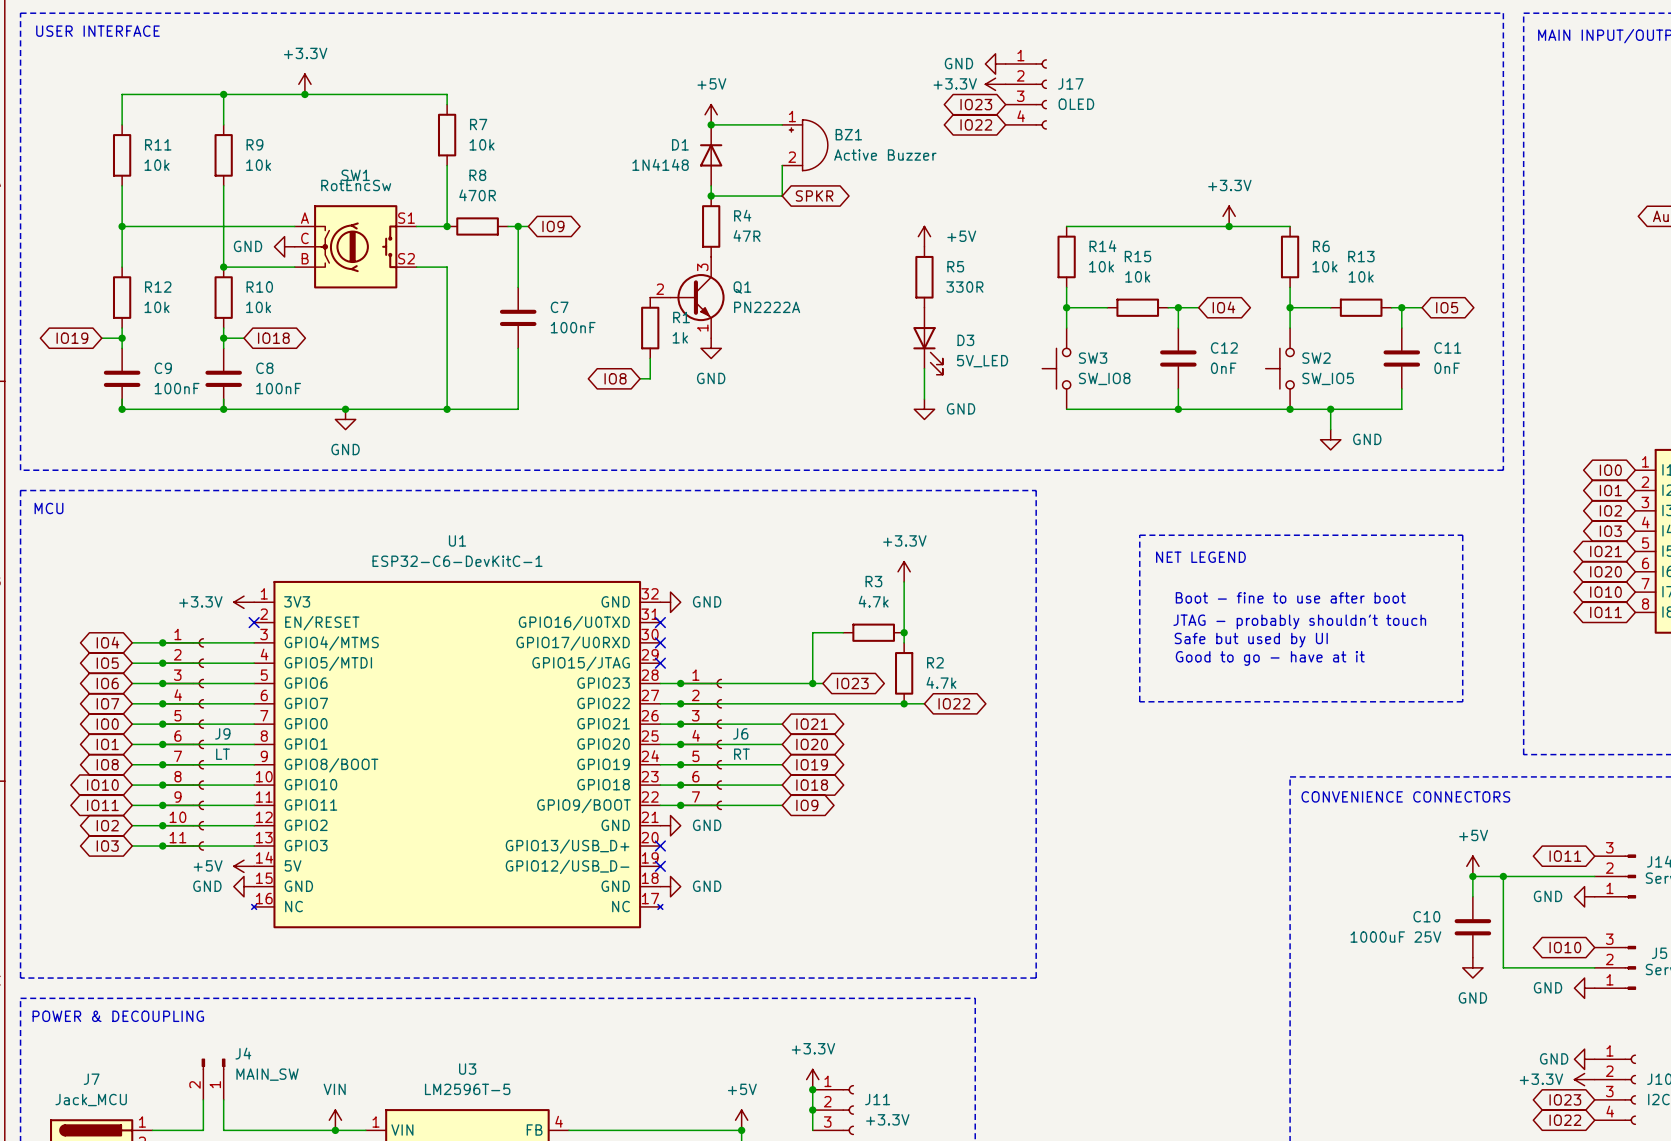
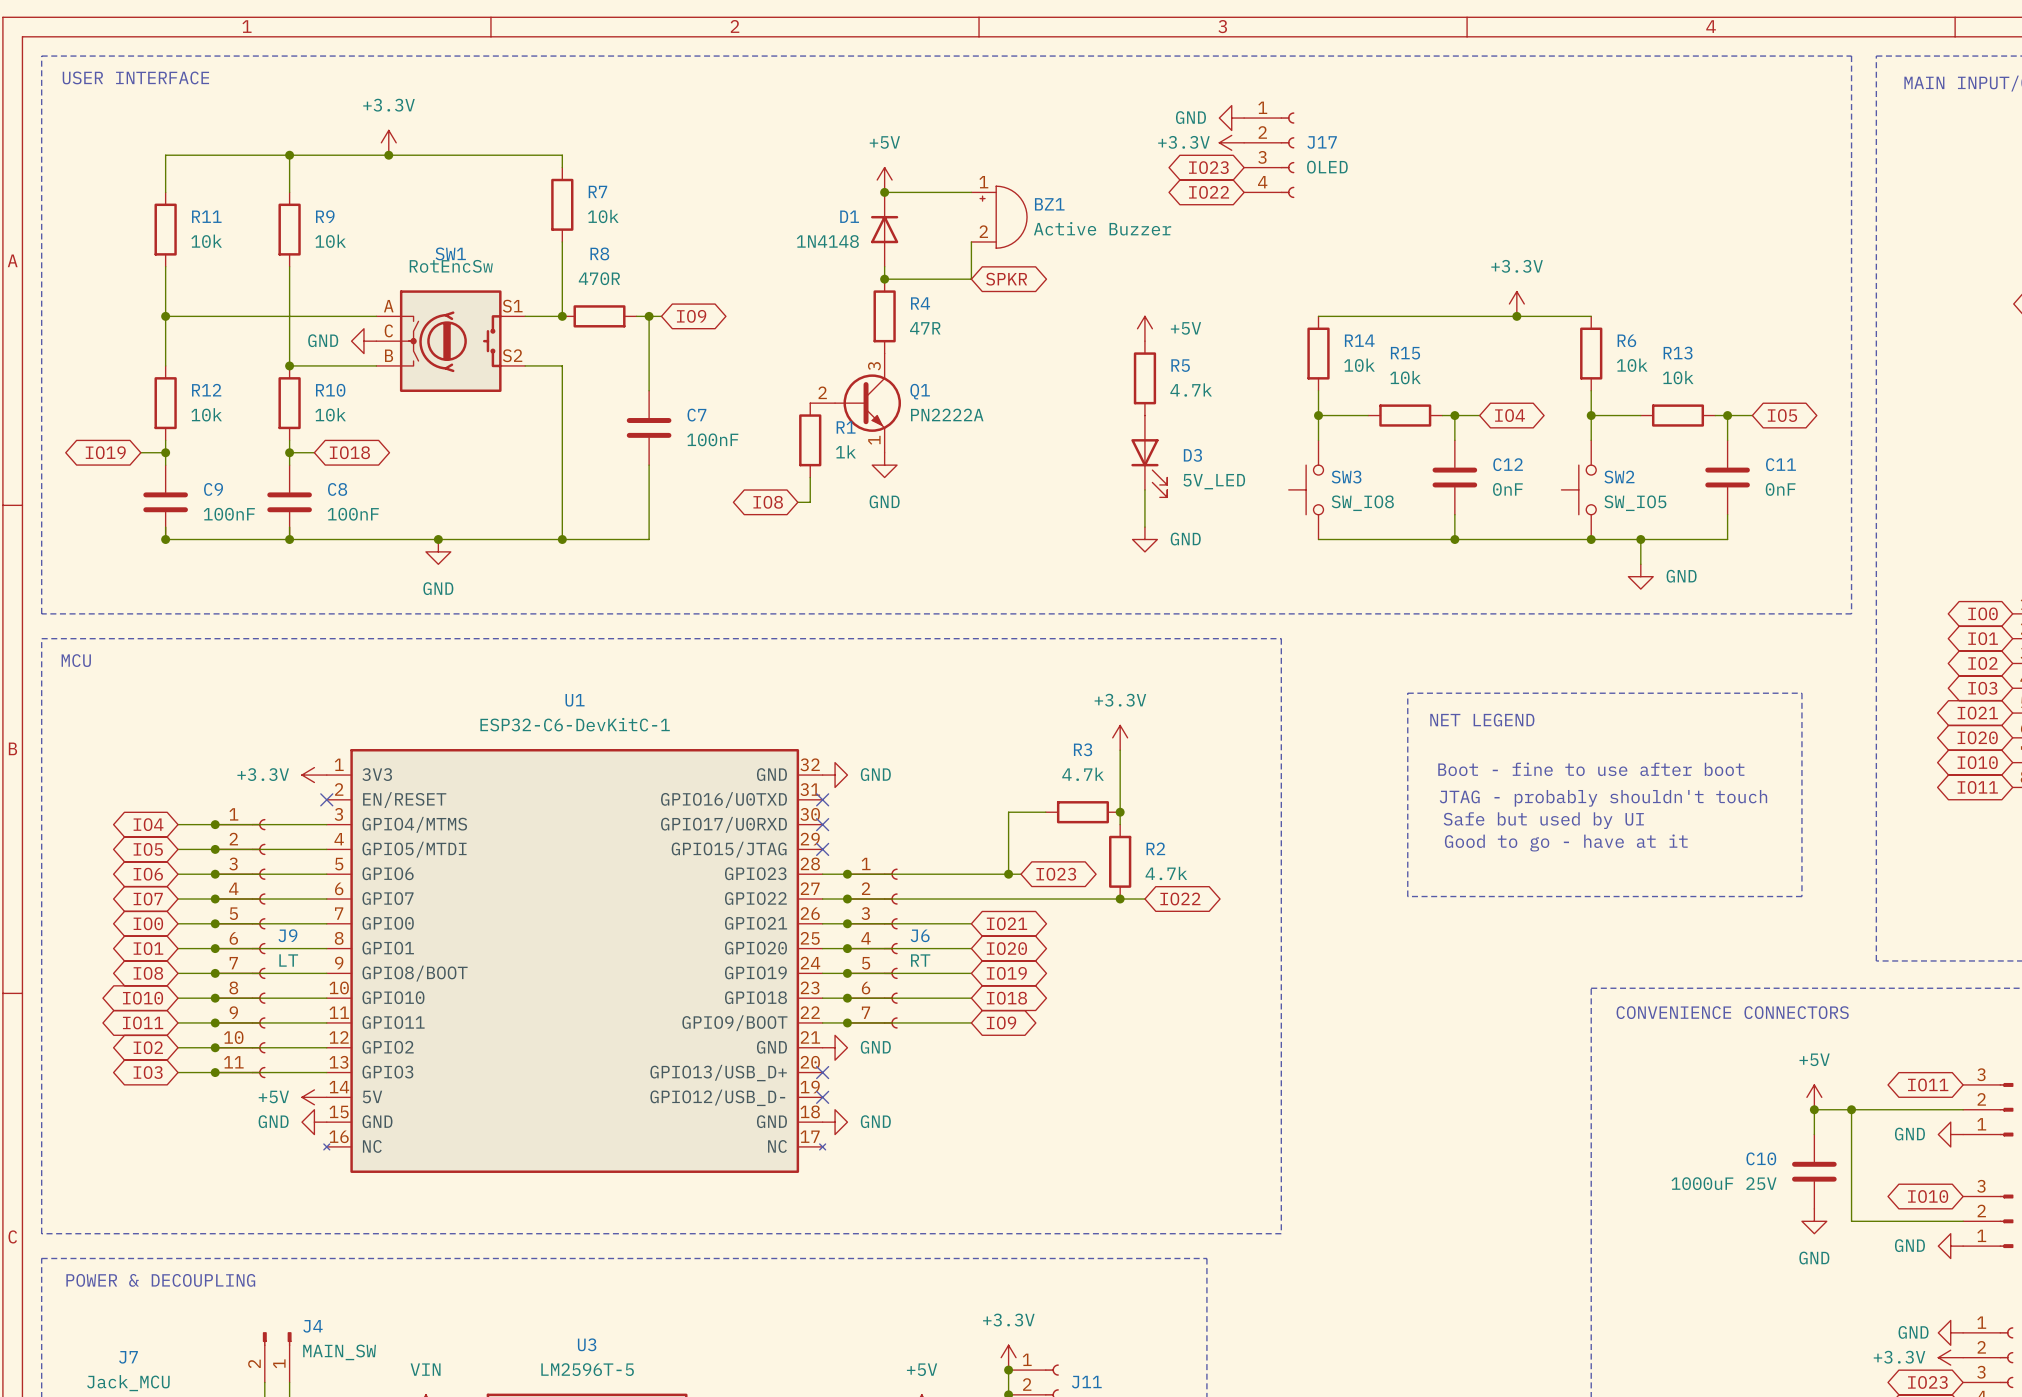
R5 value: 330R (964, 287) -> 4.7k (1191, 389)

